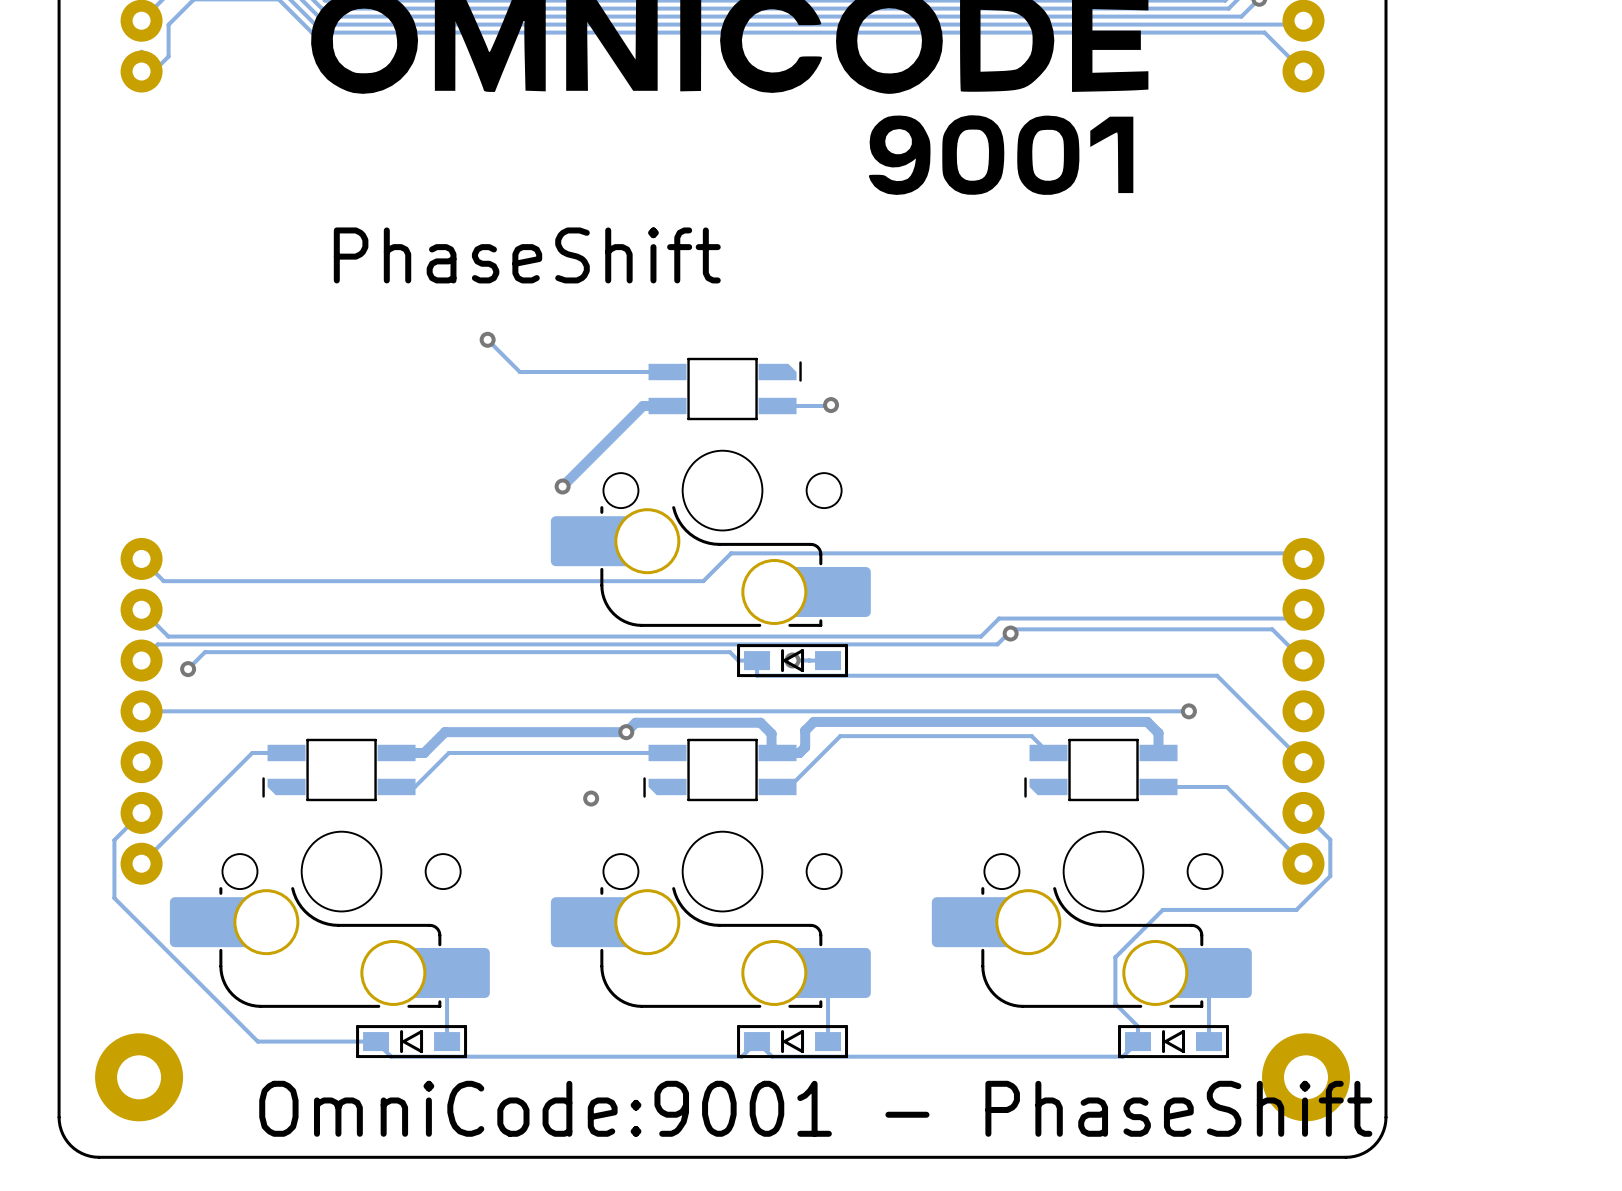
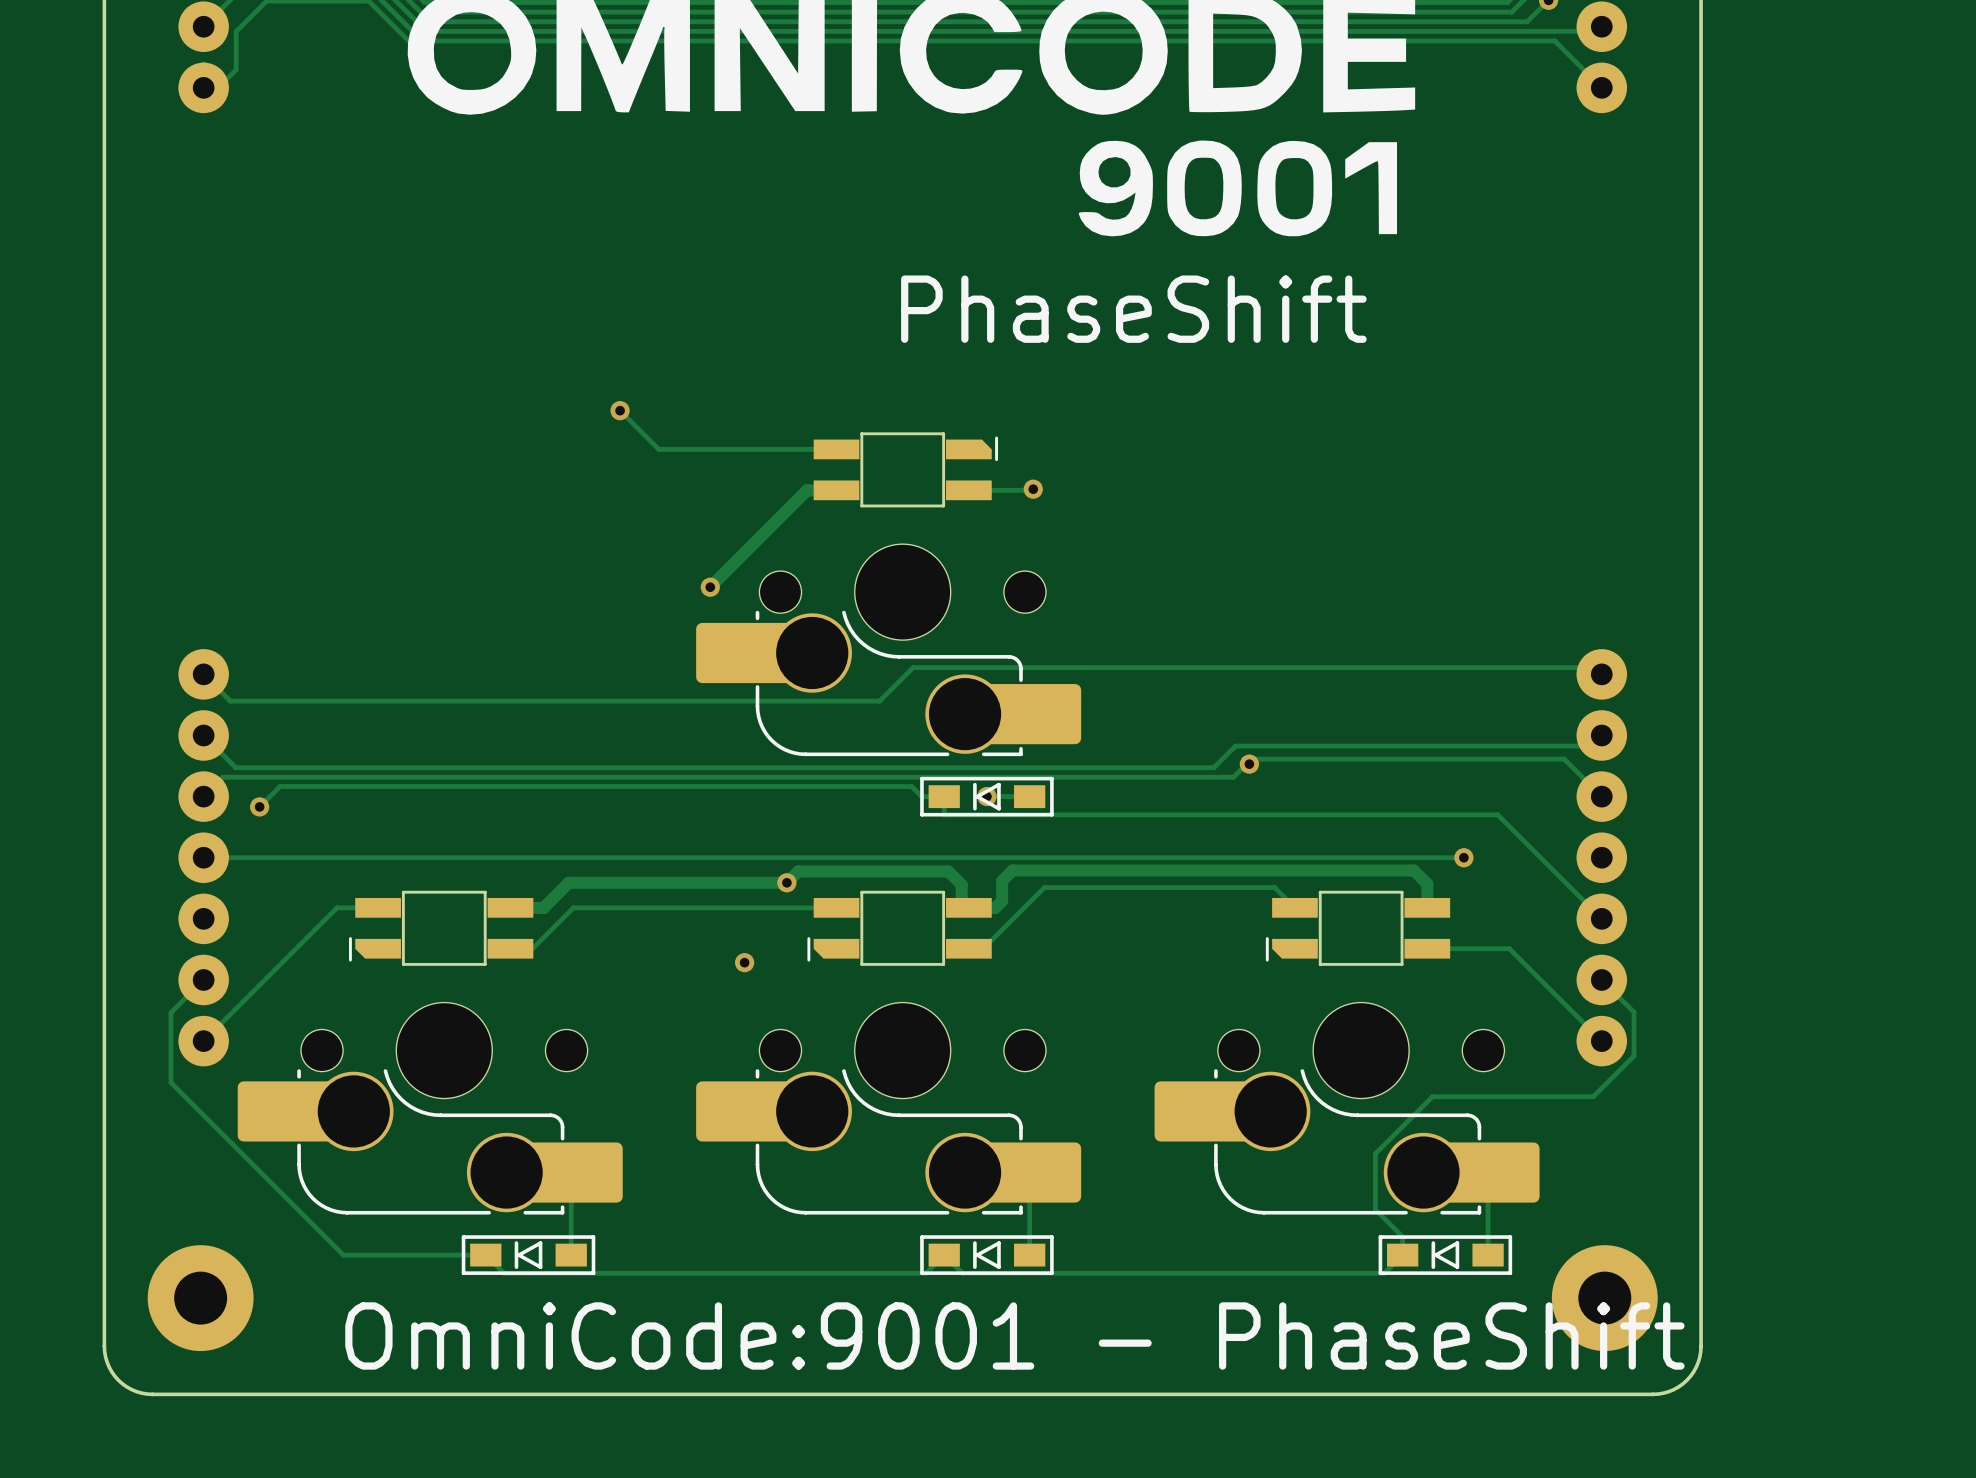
text position: PhaseShift (527, 255) -> PhaseShift (1133, 309)

